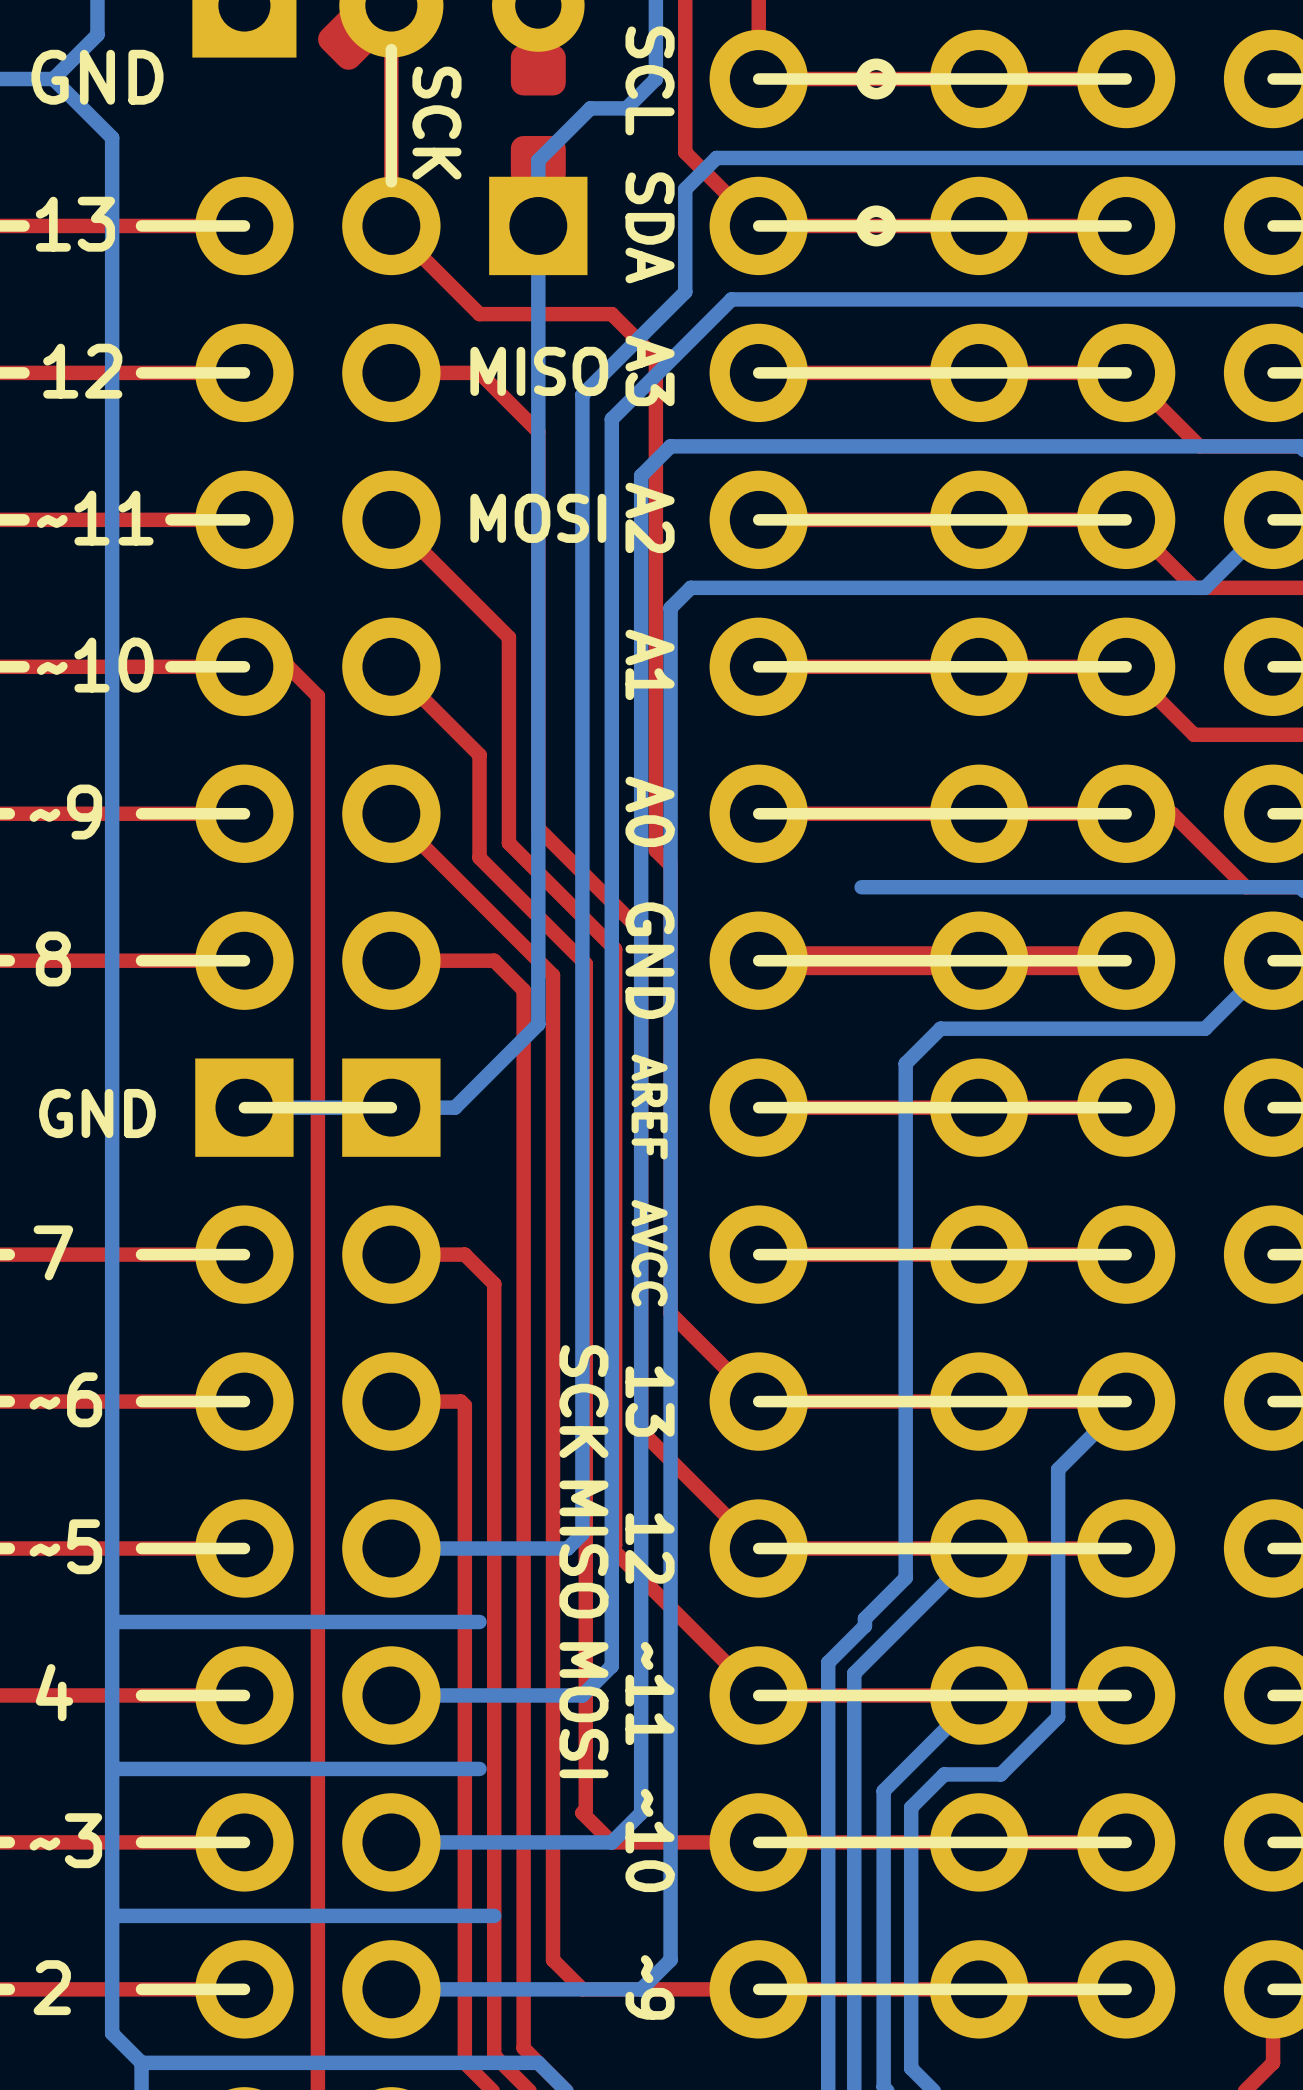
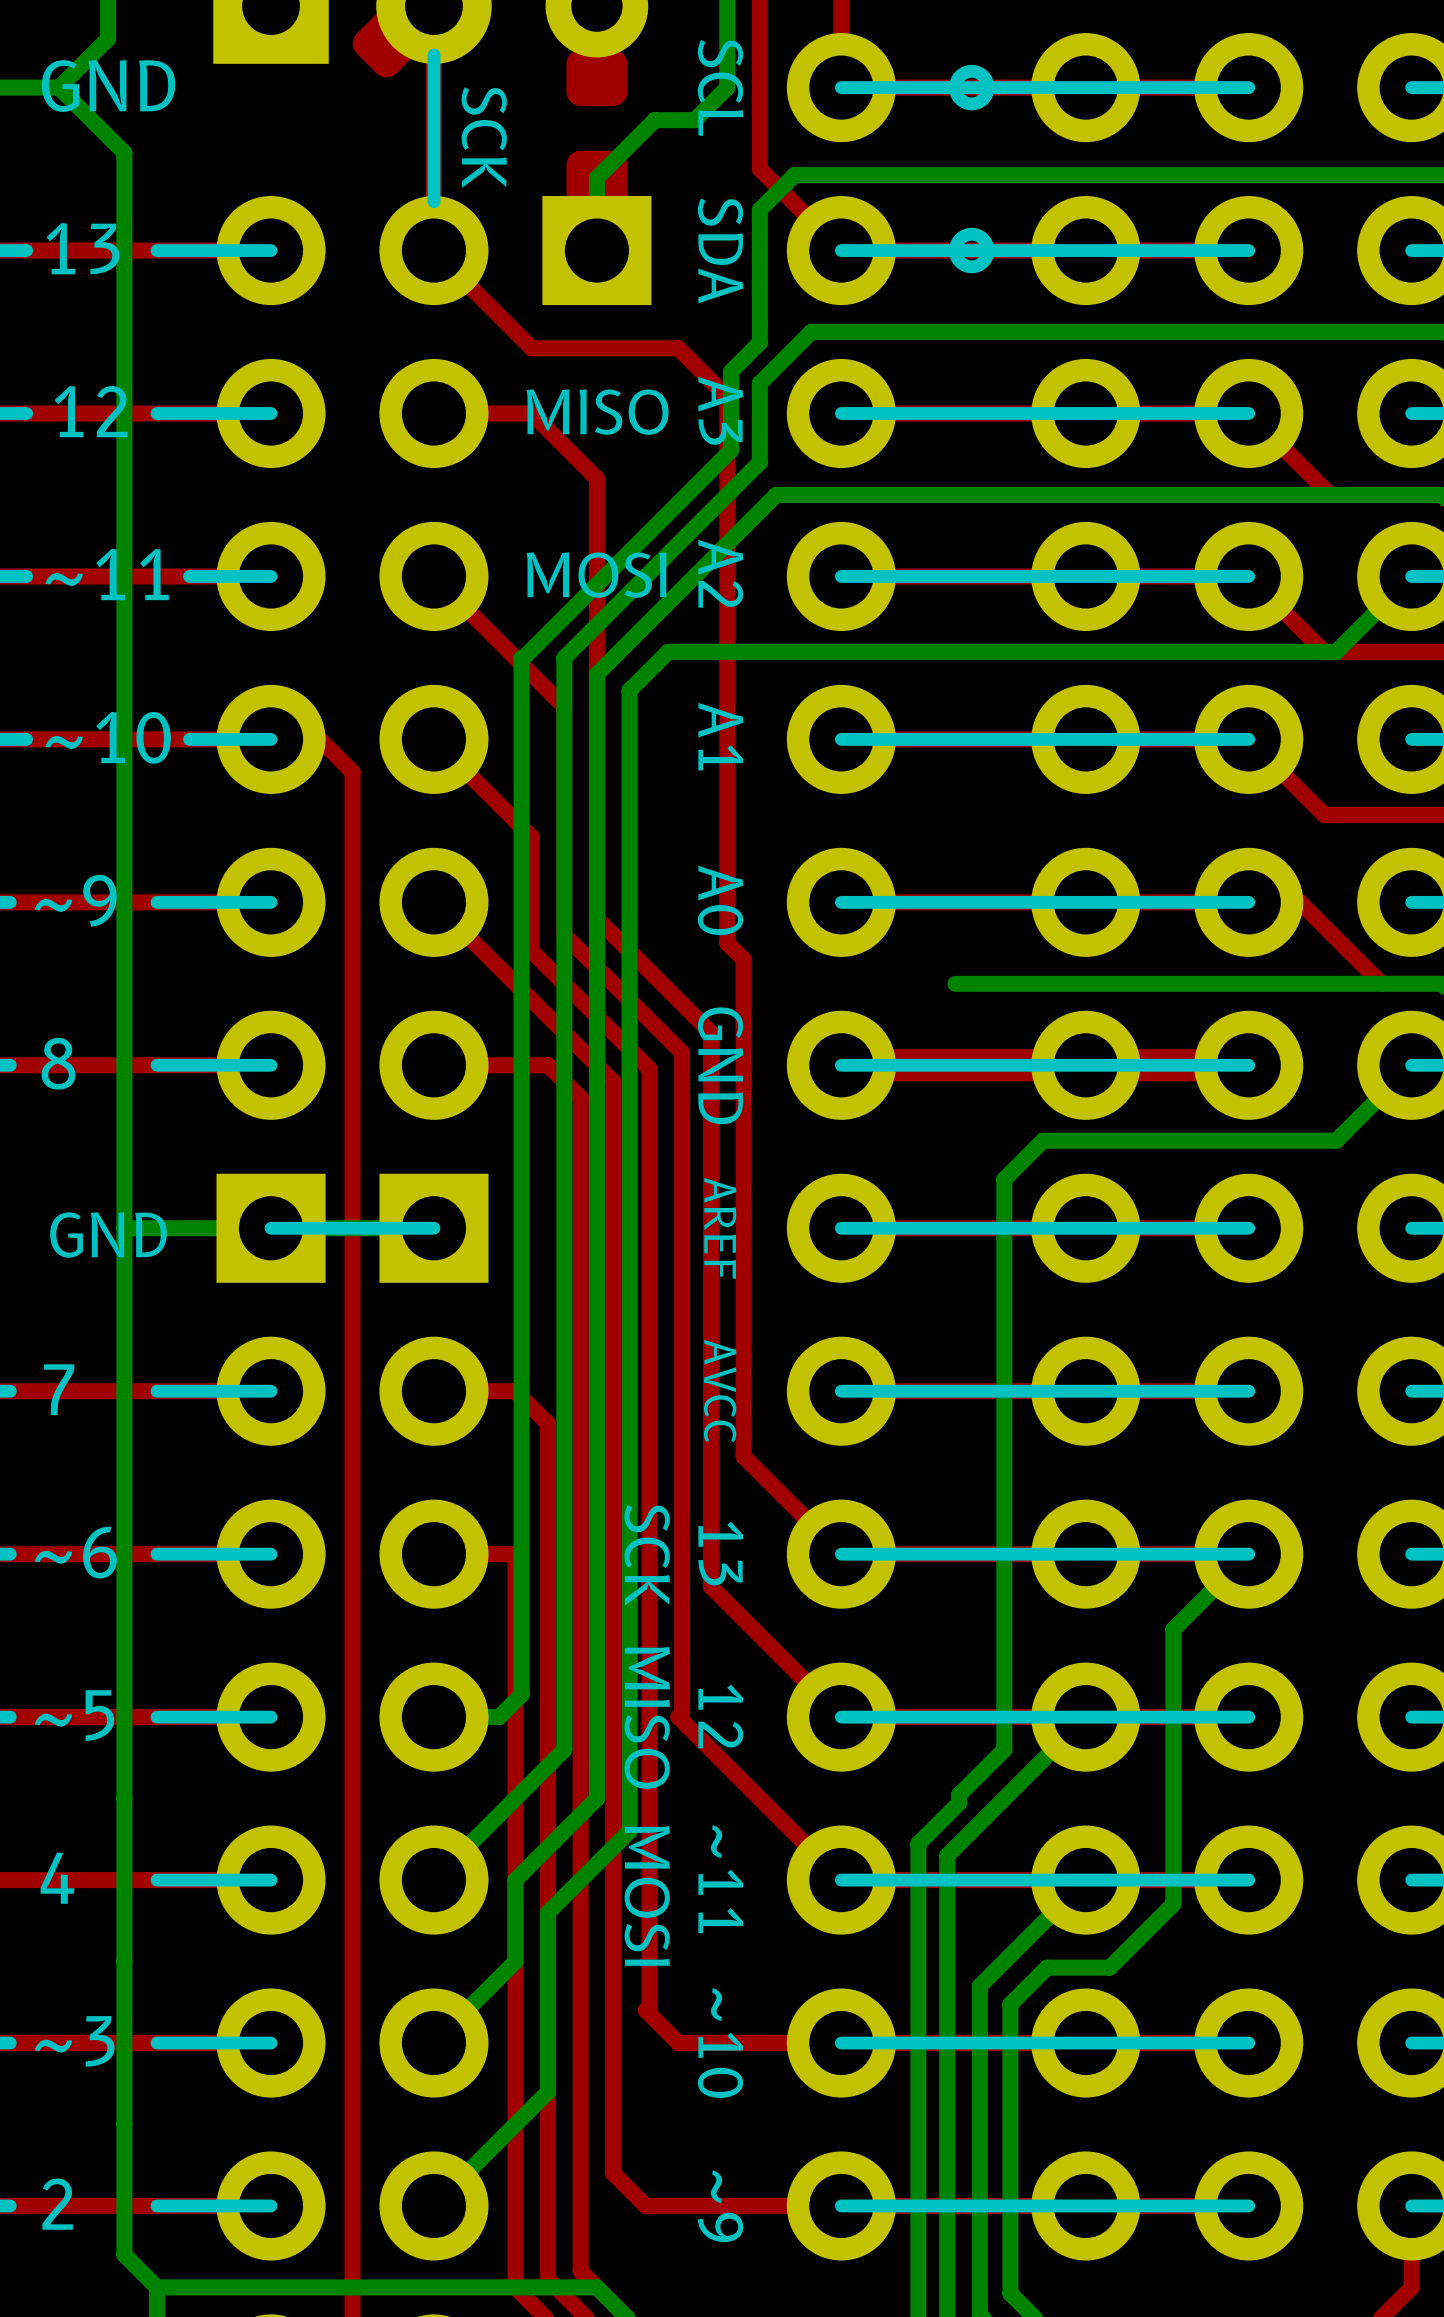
bottom track: (538, 225) (538, 608) -> (776, 494) (596, 674)
bottom track: (685, 292) (582, 394) (582, 1533) (567, 1548) (450, 1548) -> (759, 323) (759, 342) (731, 371) (731, 450) (521, 657) (521, 1694) (499, 1717)
bottom track: (685, 345) (611, 419) (611, 1666) (582, 1695) (391, 1695) -> (759, 383) (759, 462) (564, 657) (564, 1749) (433, 1880)
bottom track: (699, 446) (670, 446) (641, 475) (641, 1813) (611, 1842) (391, 1842) -> (596, 1135) (596, 1798) (515, 1880) (515, 1961) (433, 2043)
bottom track: (690, 587) (670, 608) (670, 1959) (641, 1989) (391, 1989) -> (765, 651) (668, 651) (629, 690) (629, 1831) (548, 1912) (548, 2091) (433, 2205)
bottom track: (538, 1024) (455, 1107) (391, 1107) -> none
bottom track: none -> (271, 1228) (124, 1228)
bottom track: (479, 1621) (112, 1621) -> none
bottom track: (479, 1768) (112, 1768) -> none
bottom track: (494, 1915) (112, 1915) -> none

